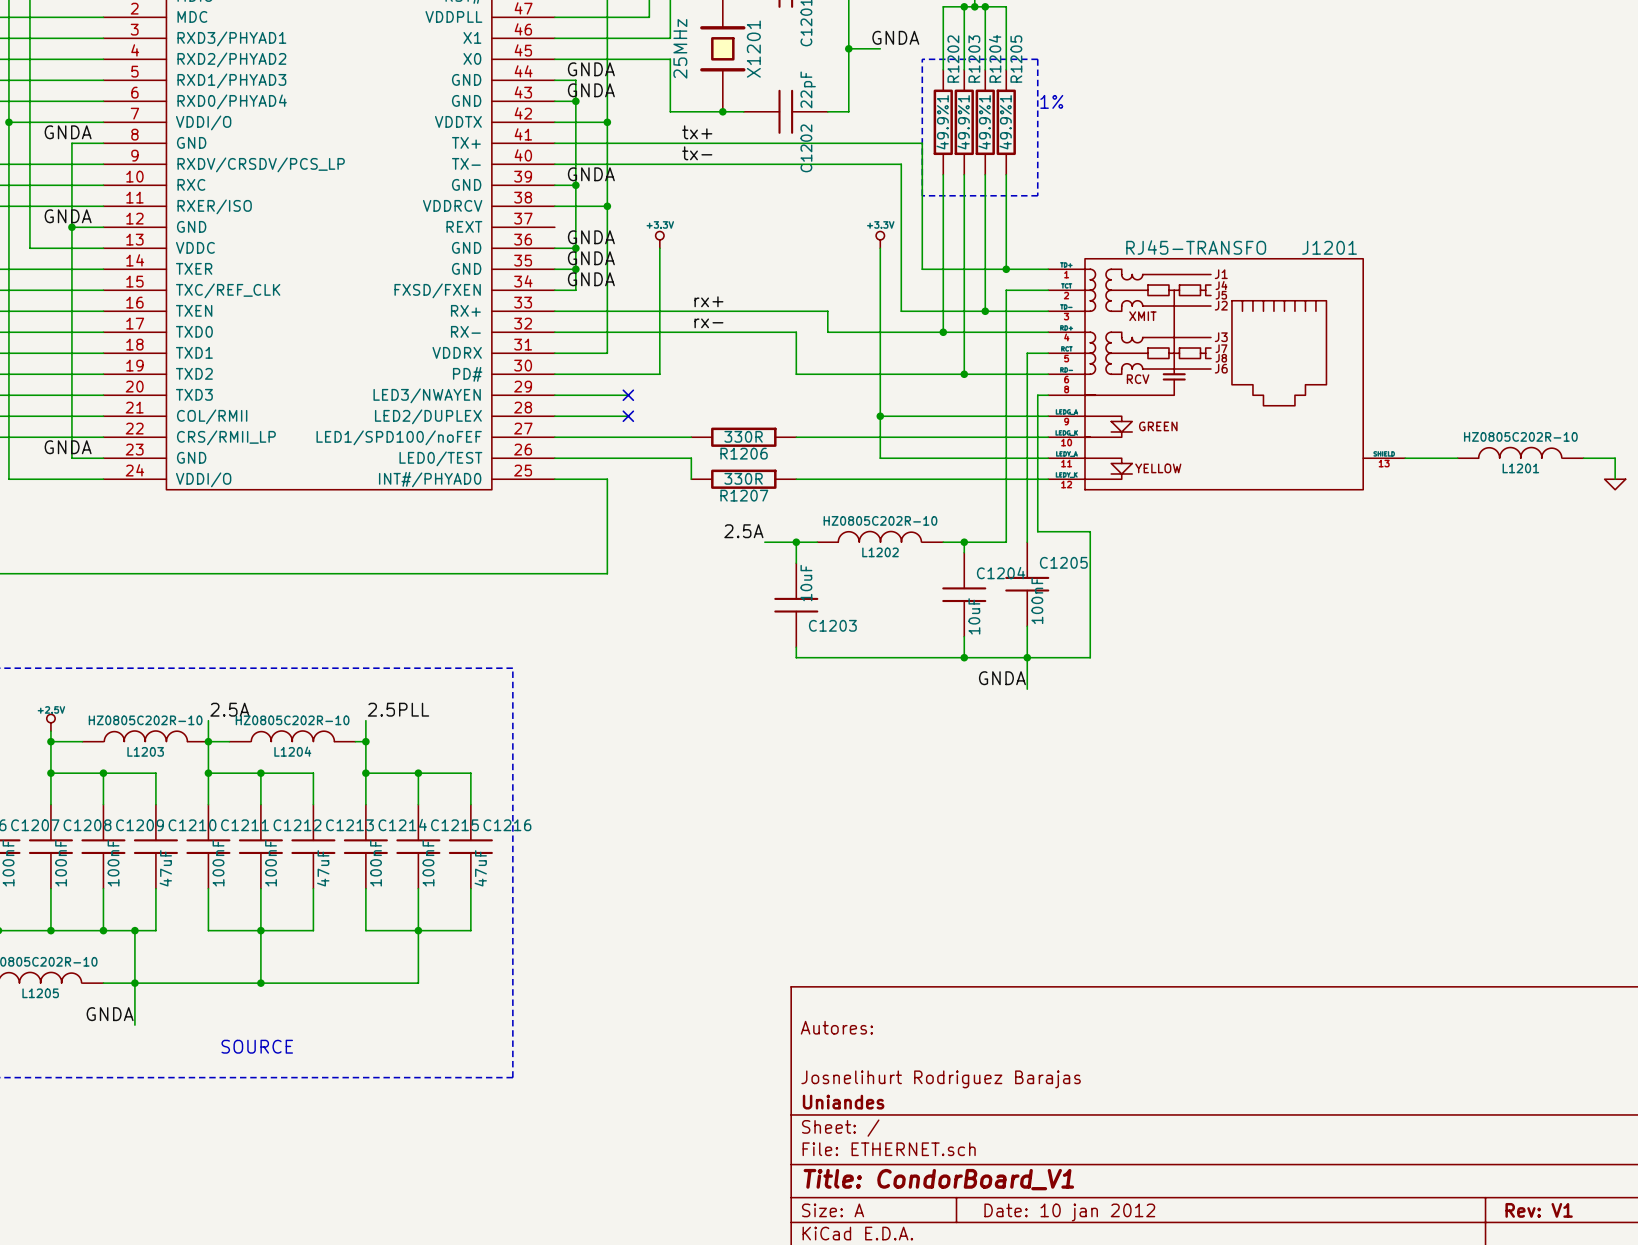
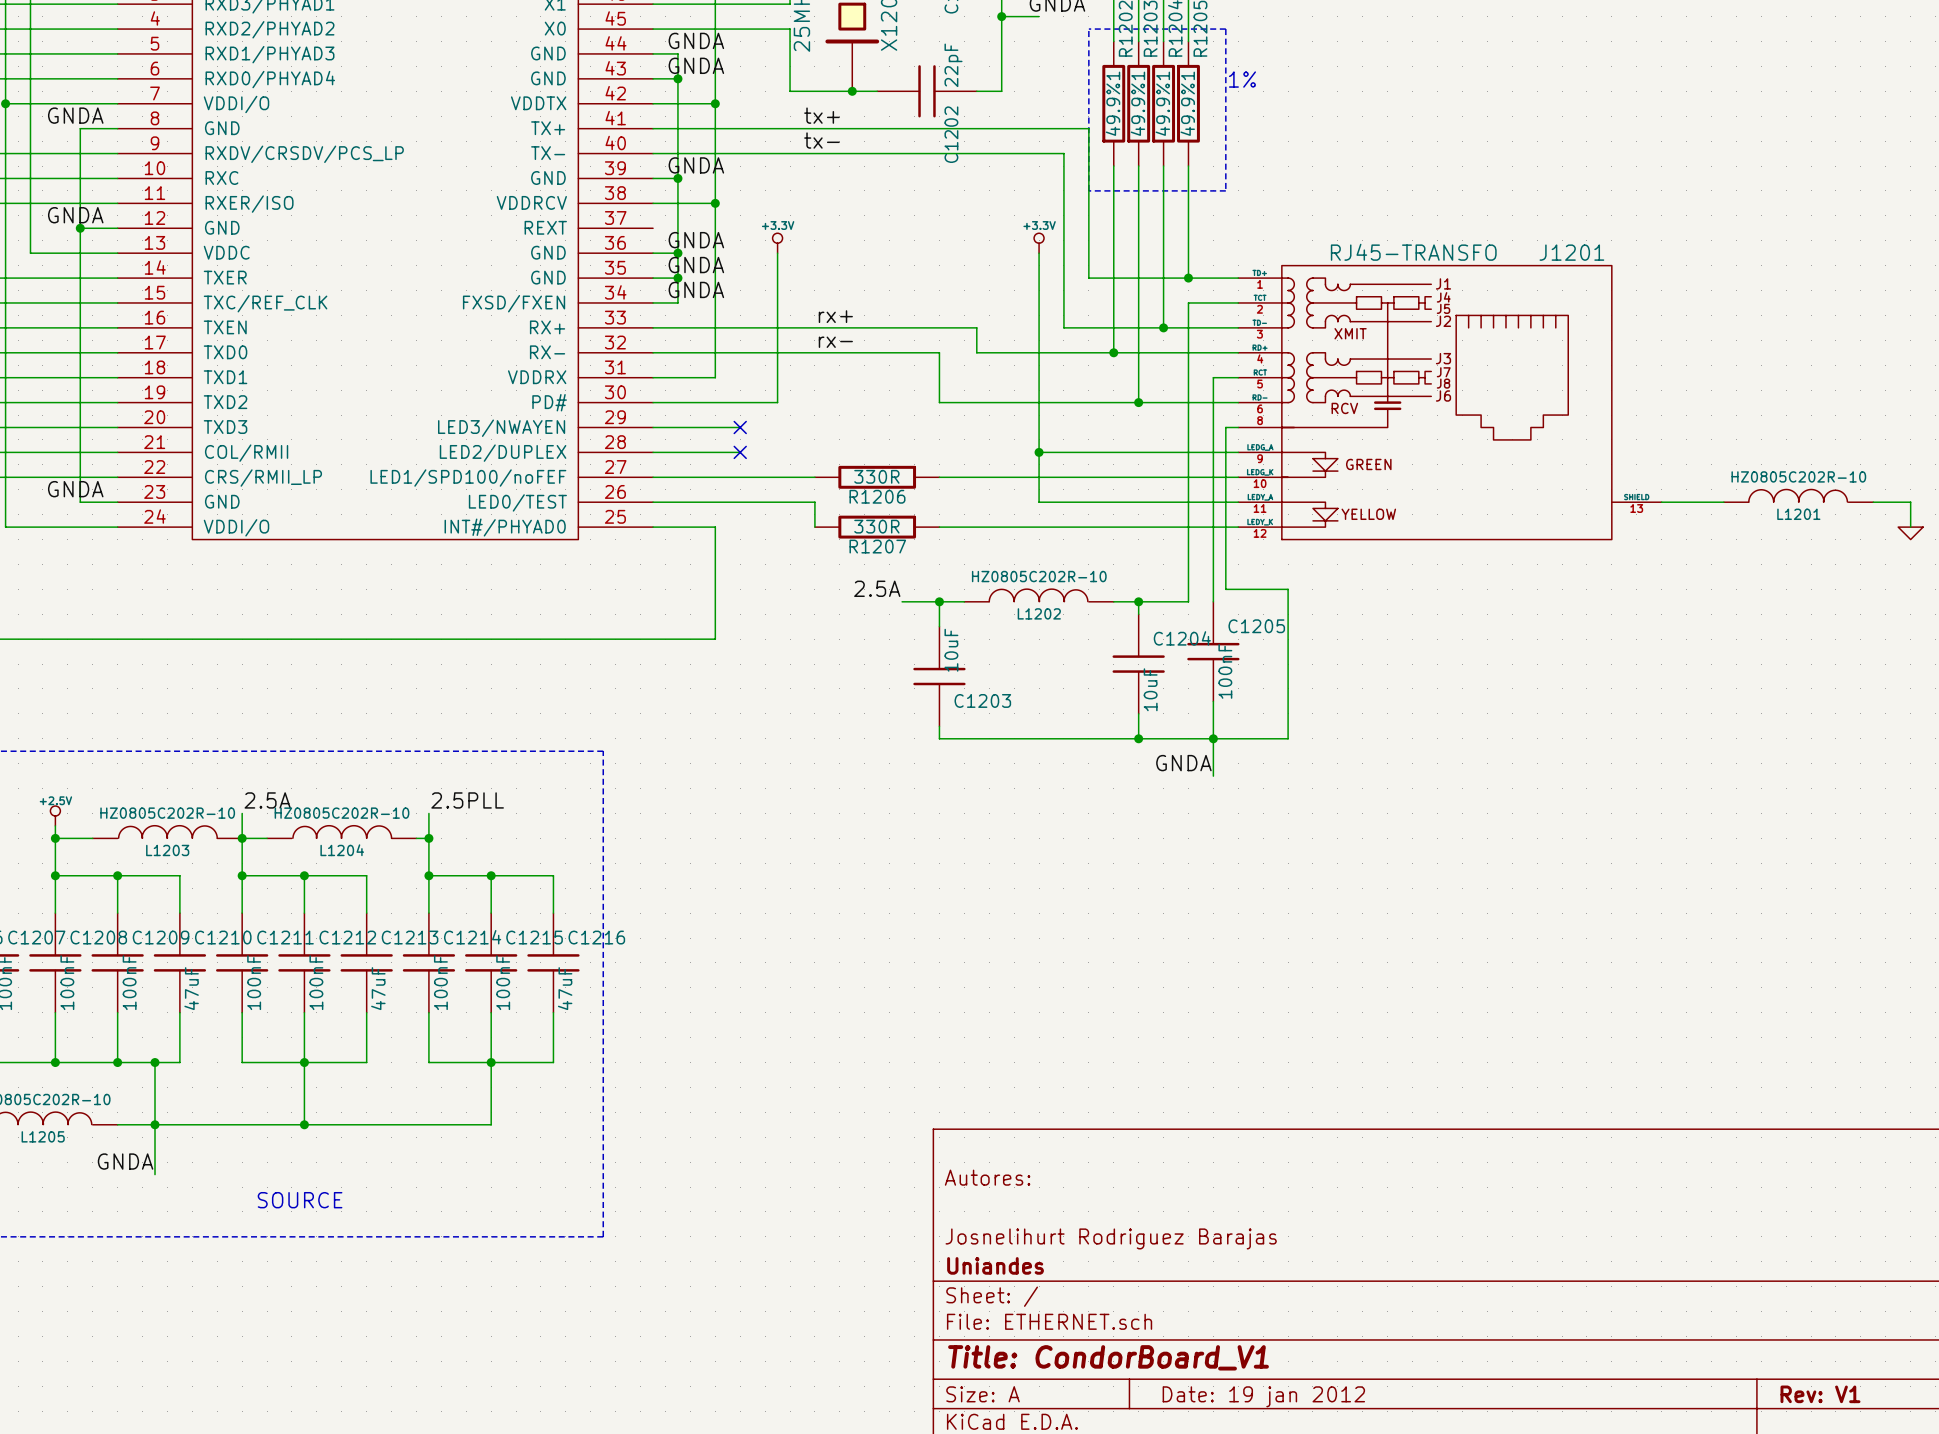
title block: Date: 10 jan 2012 (1069, 1212) -> Date: 19 jan 2012 (1263, 1396)

